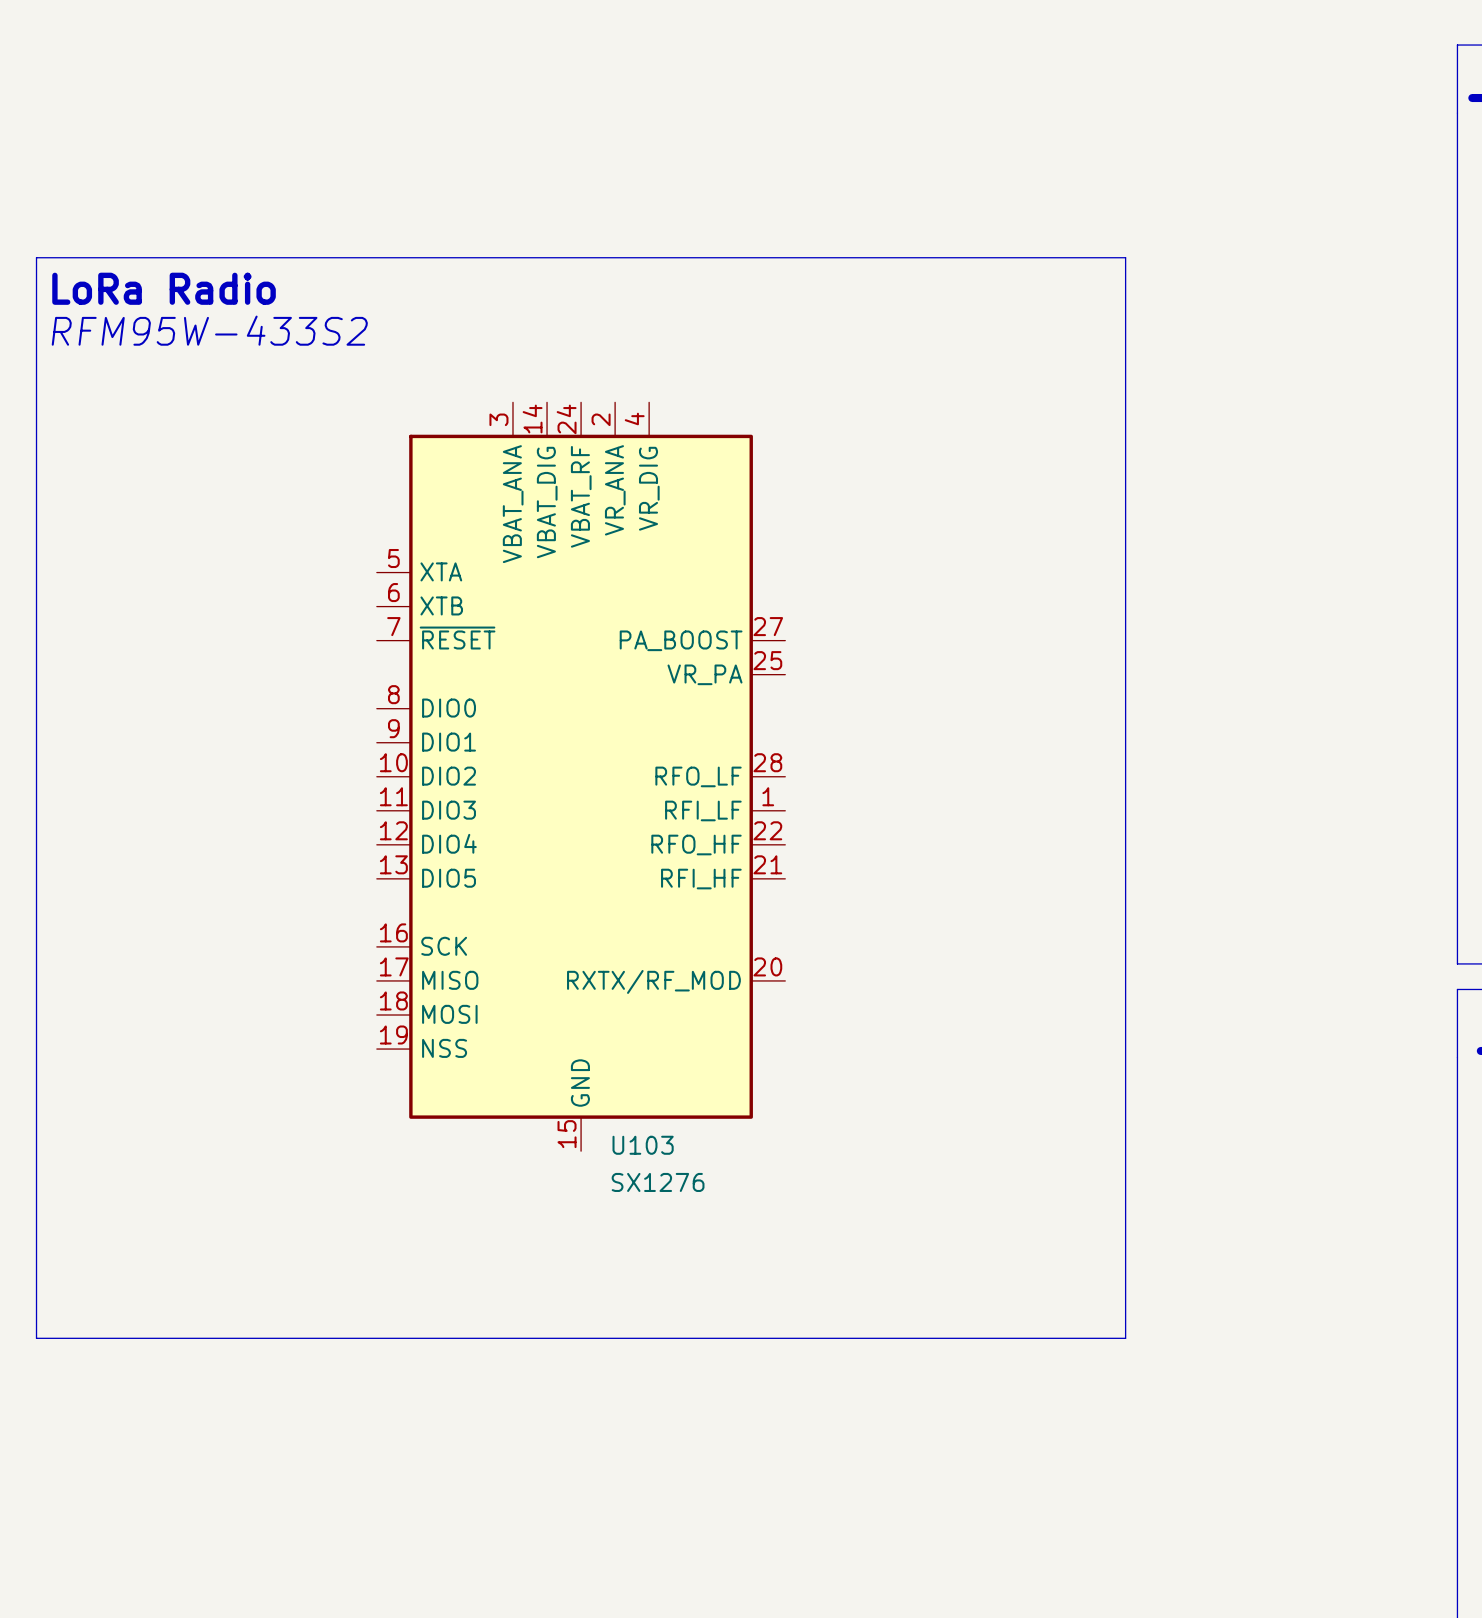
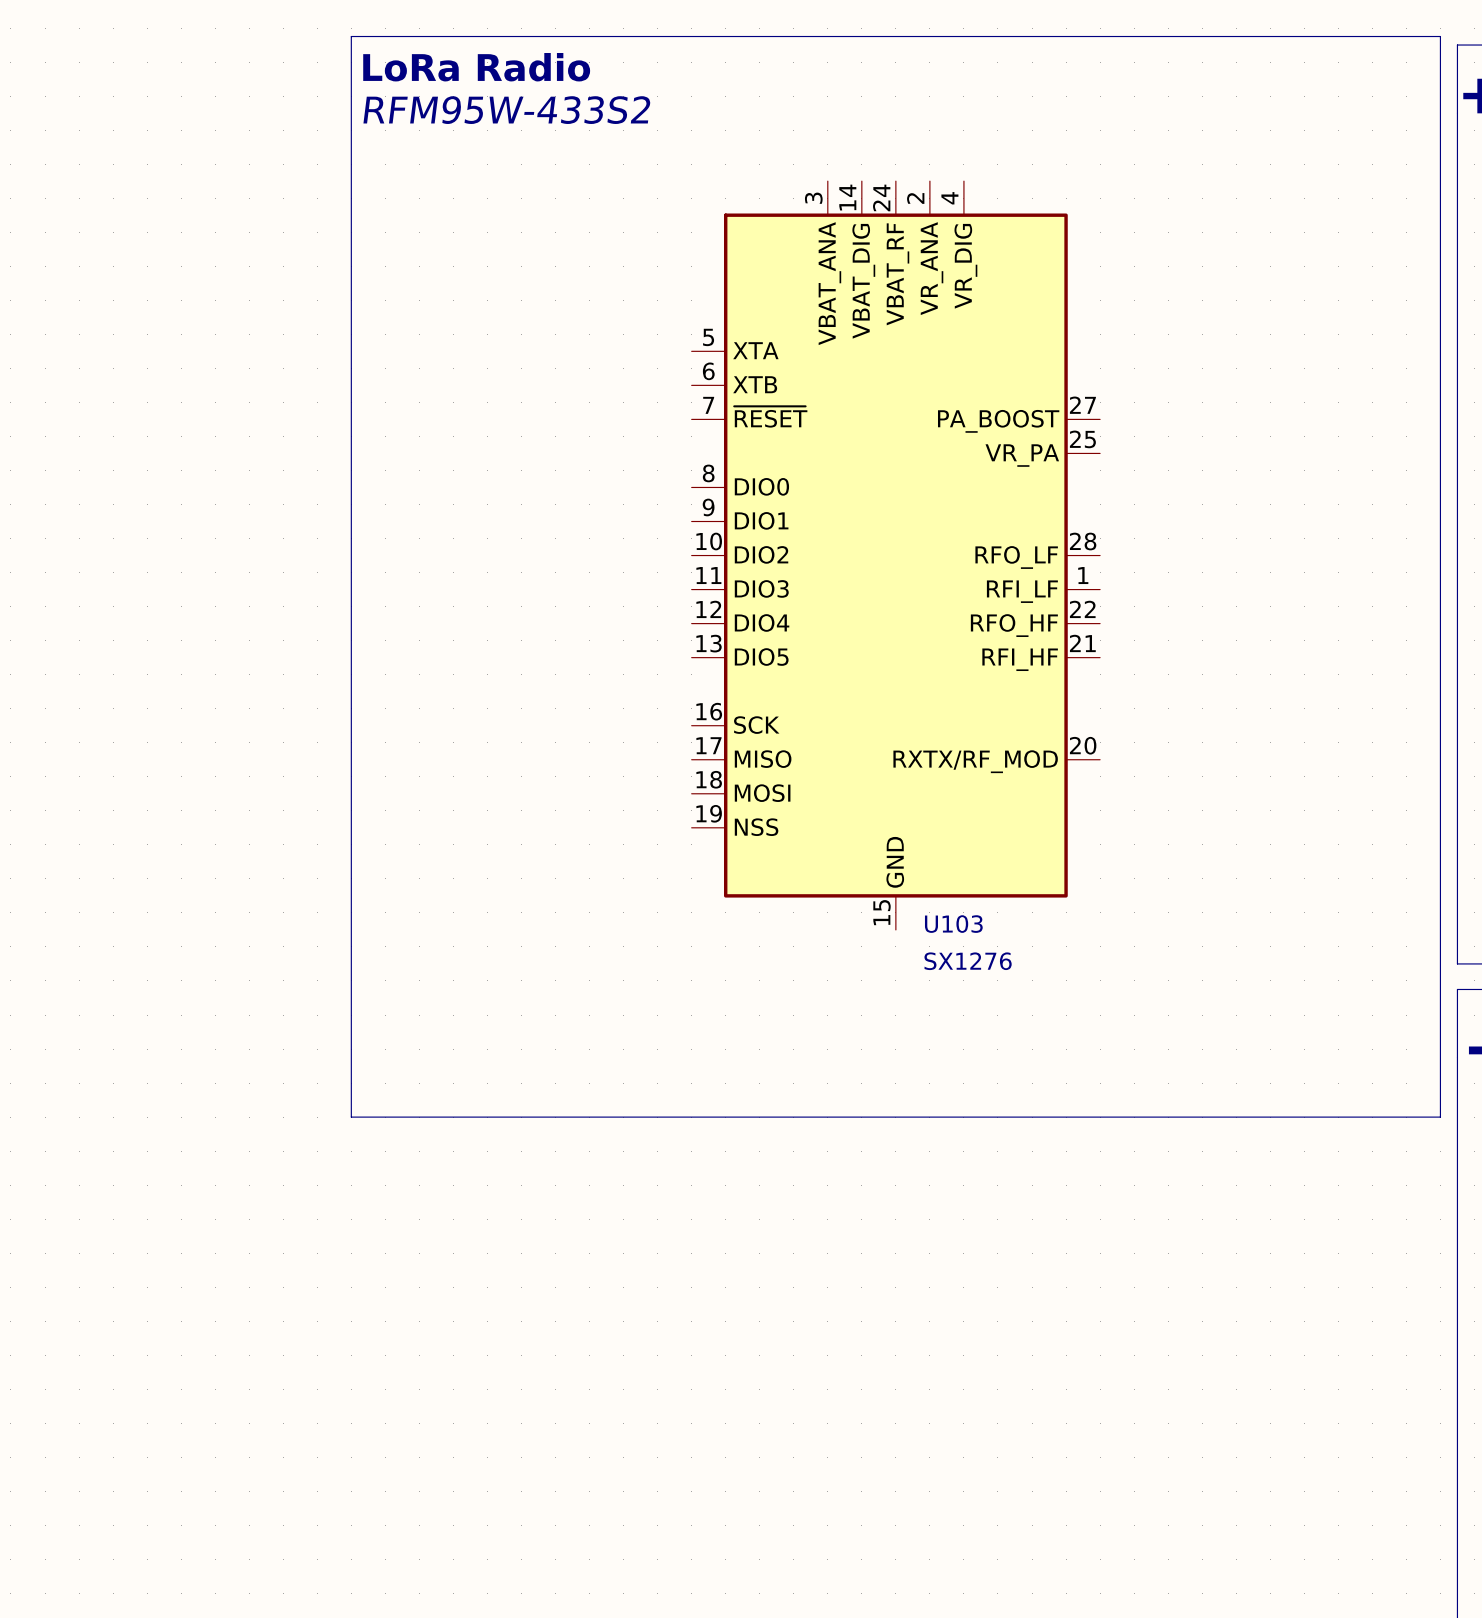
line: none -> (351, 36) (351, 1117) (1440, 1117) (1440, 36) (351, 36)
text: none -> LoRa Radio (476, 67)
text: none -> RFM95W-433S2 (507, 110)
line: (36, 257) (36, 1338) (1125, 1338) (1125, 257) (36, 257) -> none
text: LoRa Radio (164, 288) -> none
text: RFM95W-433S2 (209, 330) -> none
U103 position: (581, 776) -> (895, 555)

